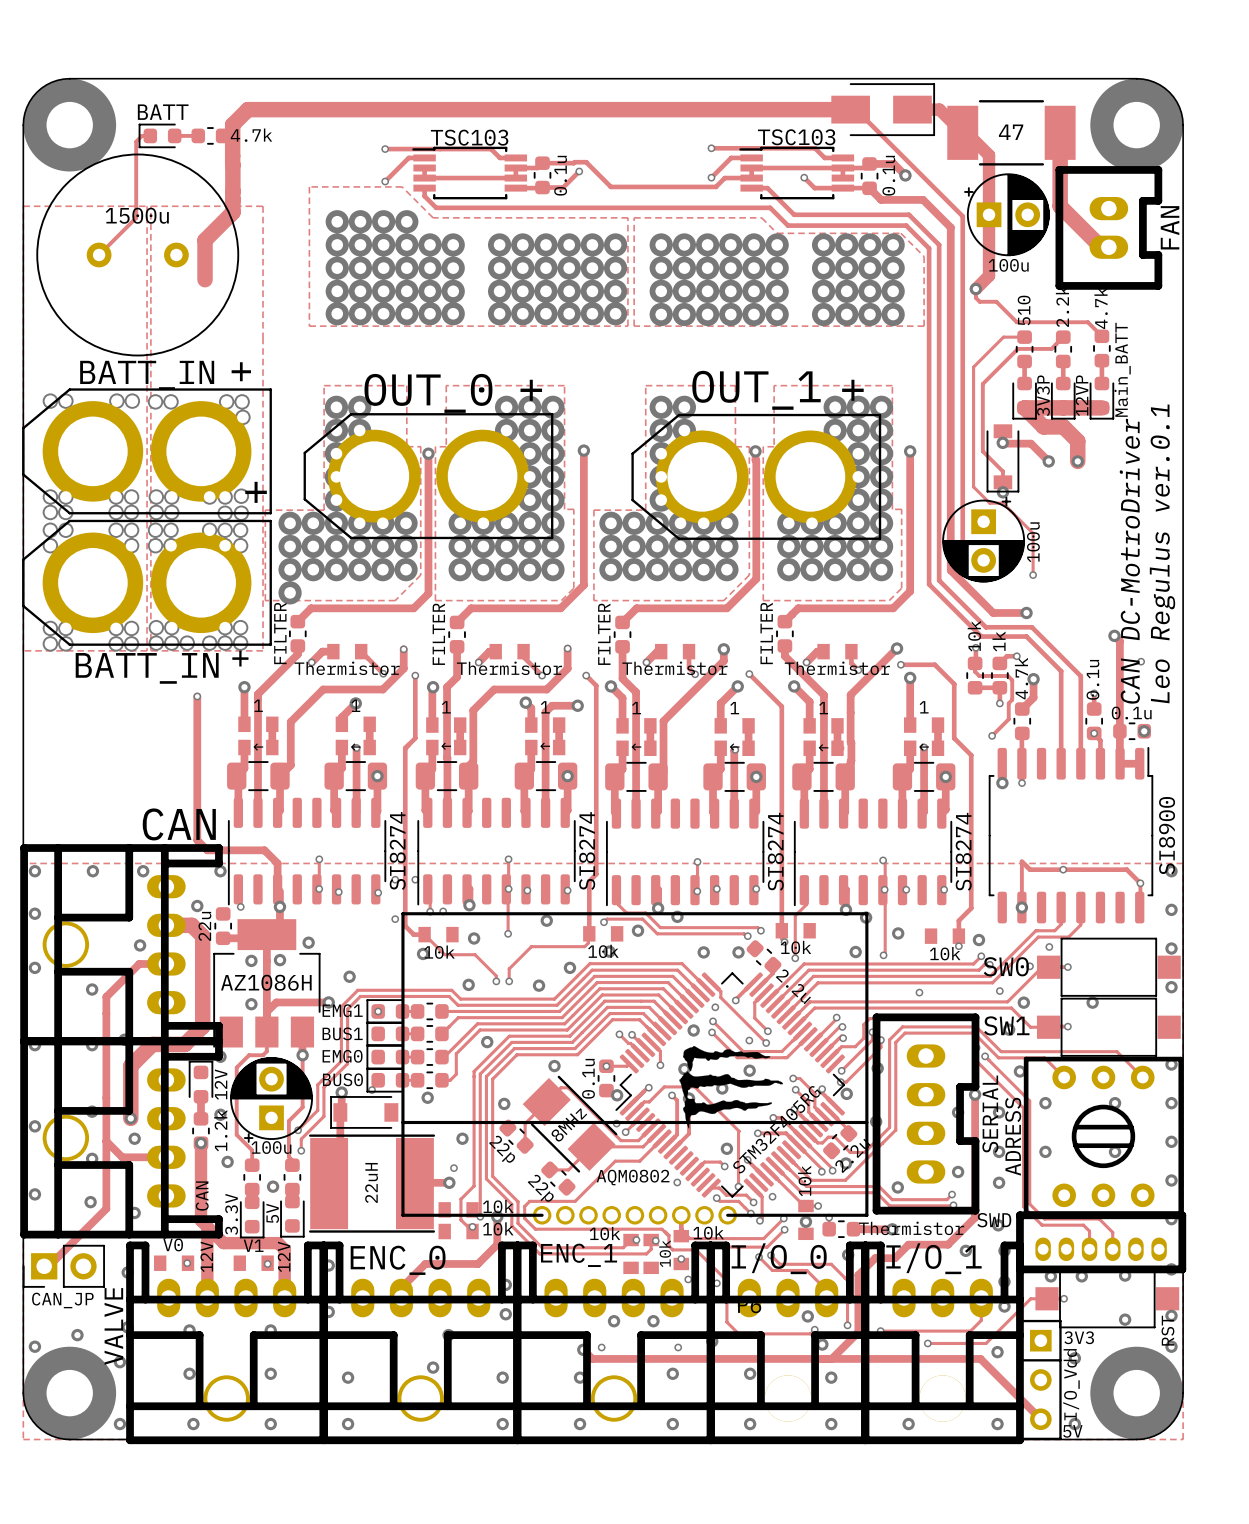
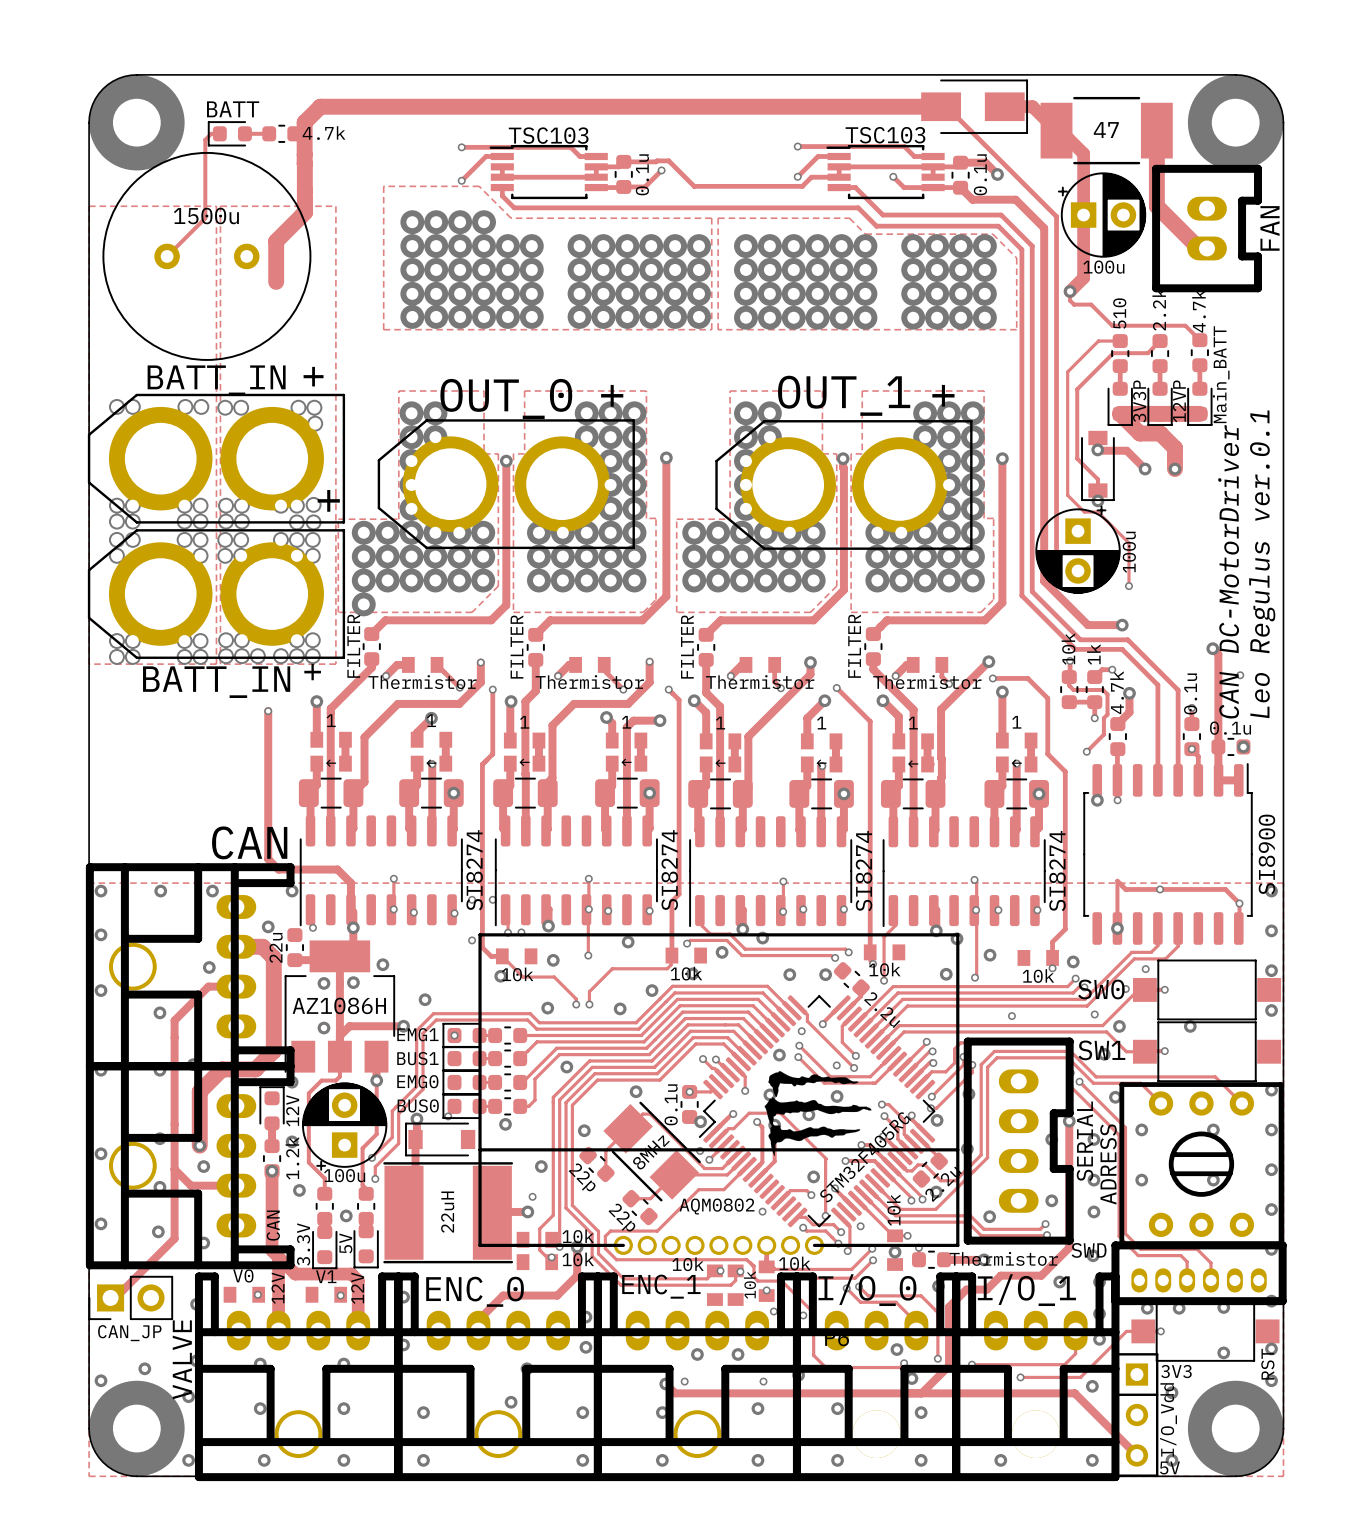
text: CAN DC-MotroDriver (1129, 561) -> CAN DC-MotorDriver (1228, 572)

